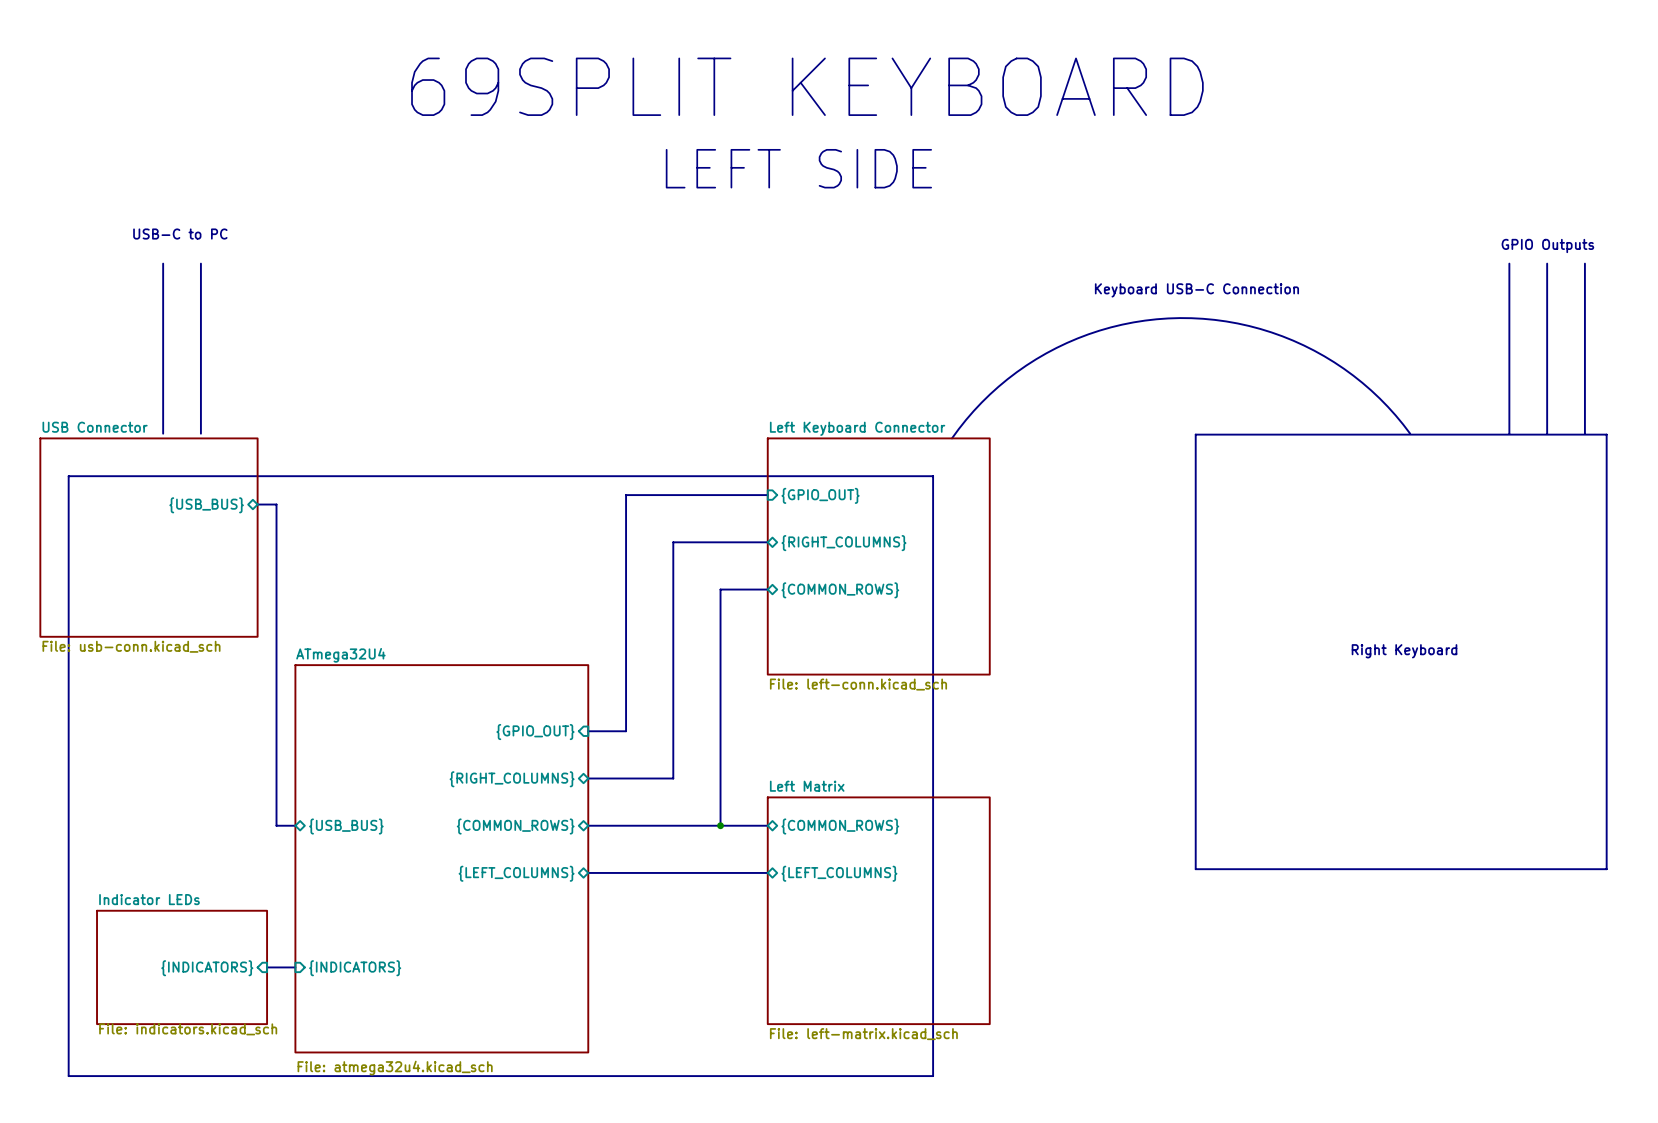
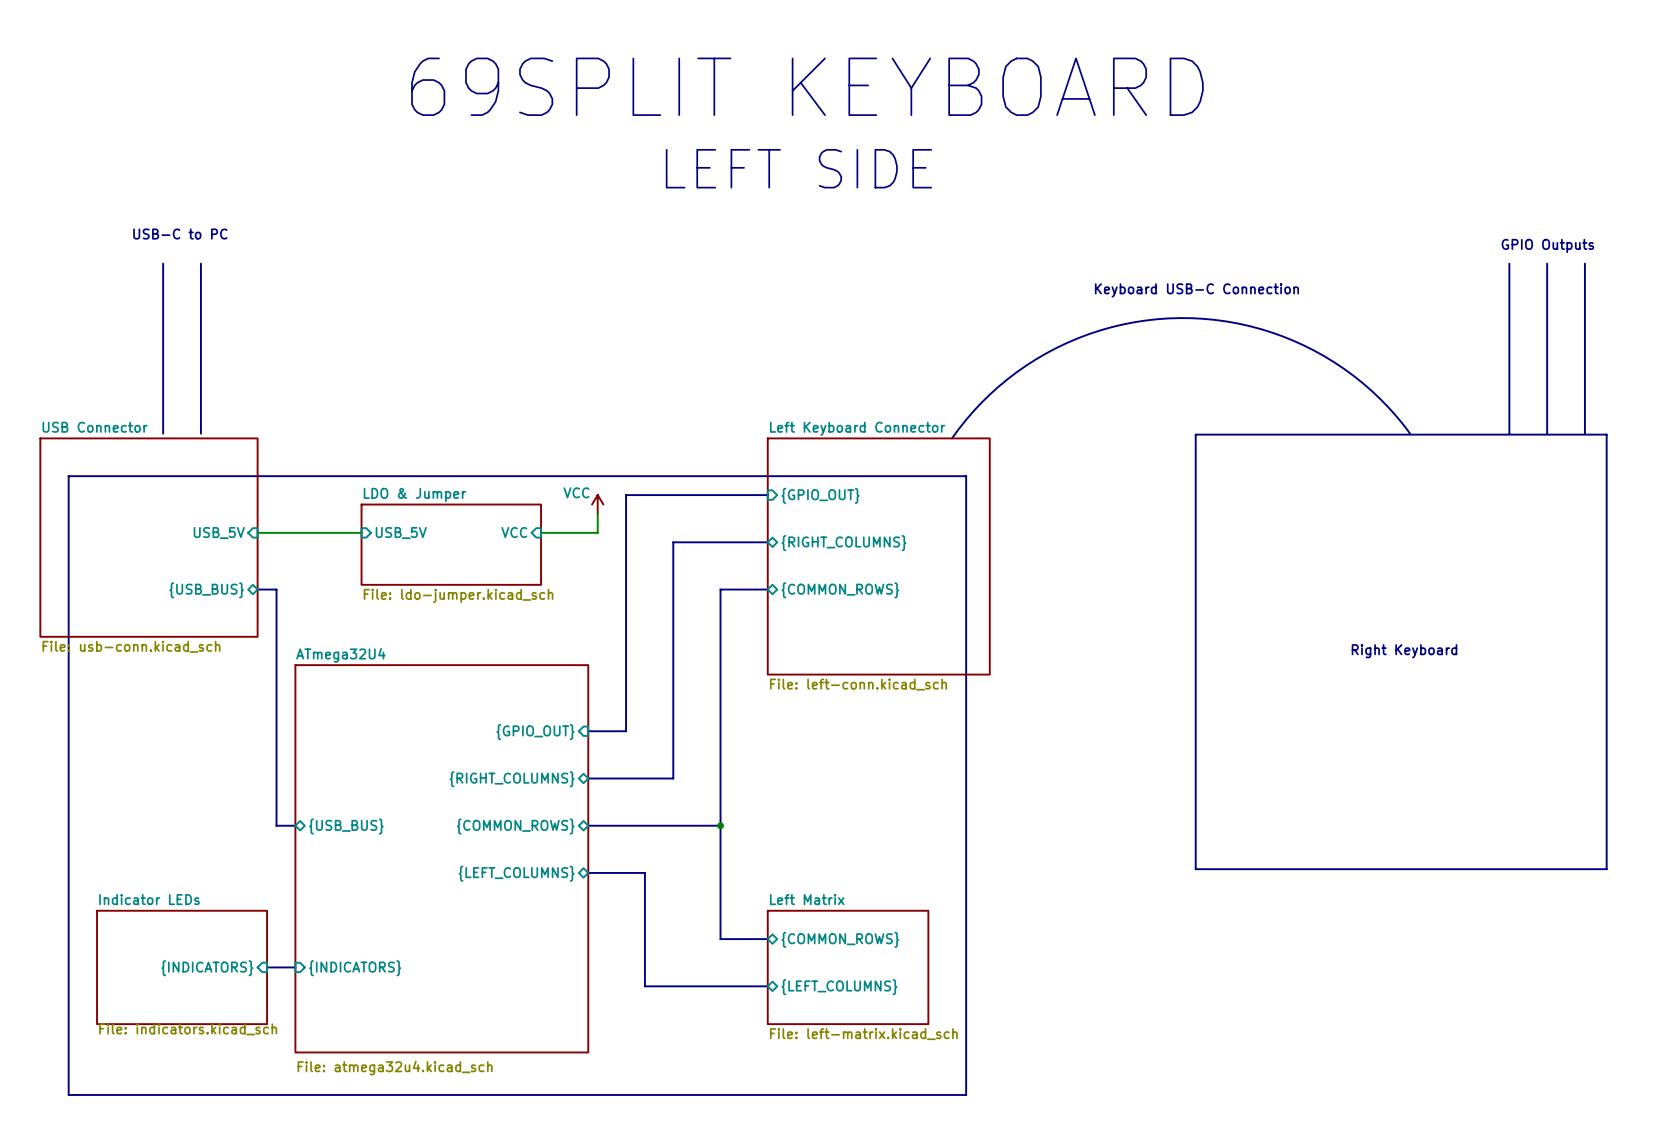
line: (933, 476) (933, 1076) (68, 1076) -> (933, 476) (966, 476) (966, 1094) (68, 1094) (68, 1076)
bus: (257, 504) (276, 504) (276, 589) -> (257, 589) (276, 589)
power symbol: none -> VCC (597, 504)
sheet pin position: {USB_BUS} (206, 505) -> {USB_BUS} (206, 590)
wire: none -> (597, 513) (597, 532) (541, 532)
sheet pin: none -> USB_5V (219, 532)
wire: none -> (257, 532) (361, 532)
sheet pin: none -> USB_5V (401, 532)
sheet pin: none -> VCC (514, 532)
sheet LDO & Jumper: none -> File: ldo-jumper.kicad_sch (451, 544)
bus: (720, 825) (767, 825) -> (720, 825) (720, 939) (767, 939)
sheet pin position: {COMMON_ROWS} (840, 826) -> {COMMON_ROWS} (840, 939)
bus: (644, 872) (767, 872) -> (644, 872) (644, 986) (767, 986)
sheet pin position: {LEFT_COLUMNS} (839, 873) -> {LEFT_COLUMNS} (839, 987)
sheet Left Matrix: File: left-matrix.kicad_sch (878, 910) -> none
sheet Left Matrix: none -> File: left-matrix.kicad_sch (848, 967)

